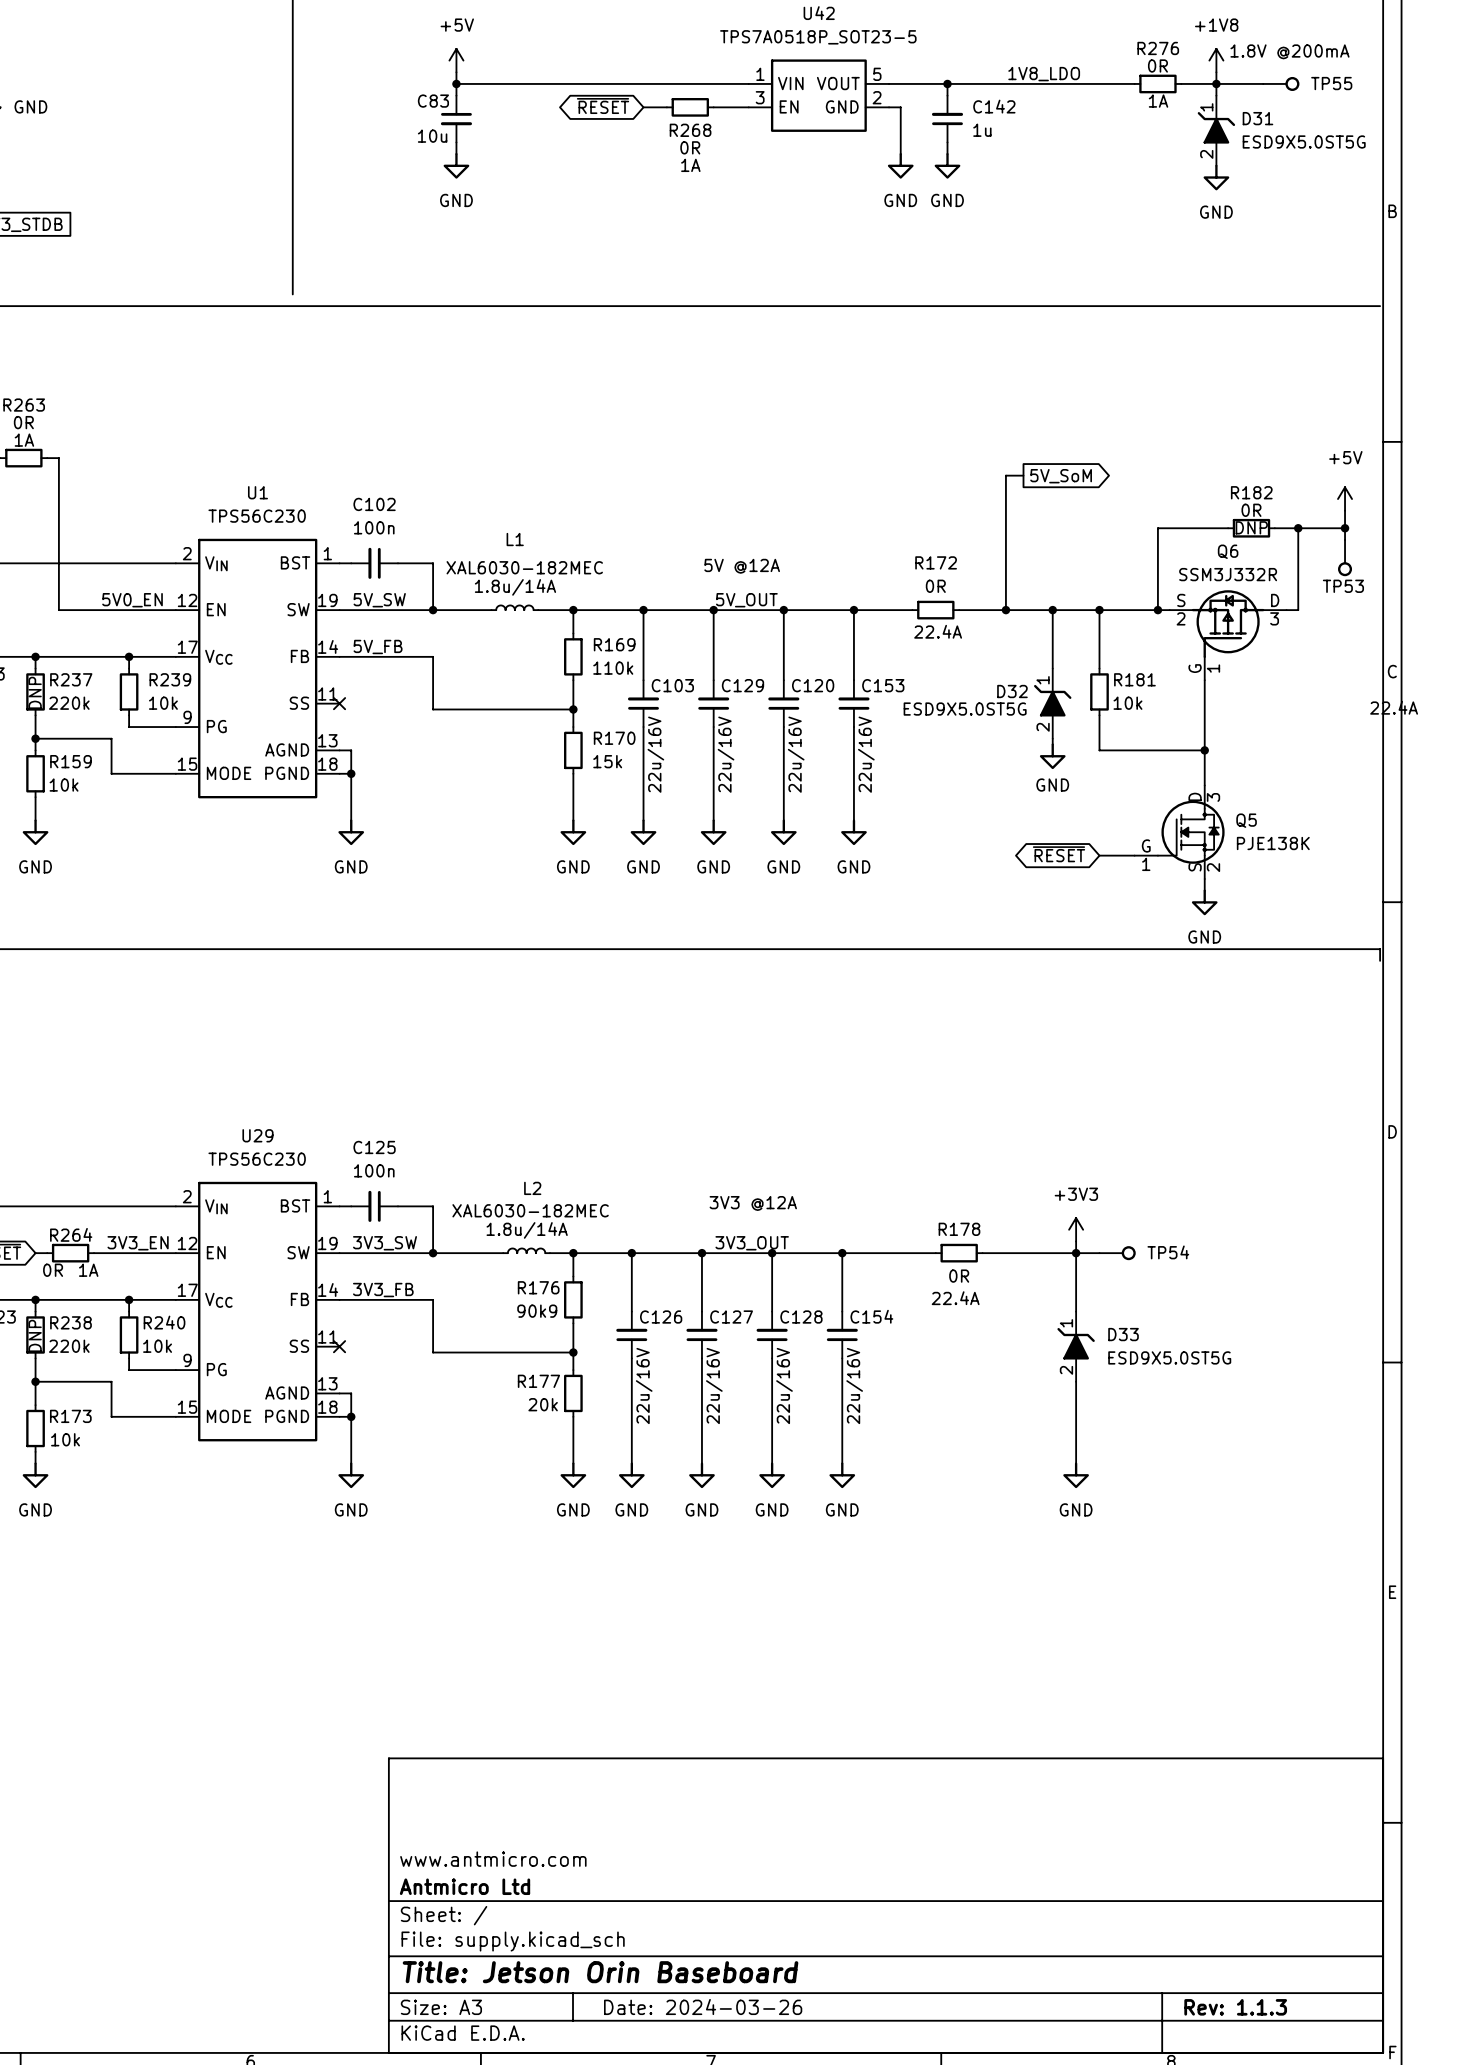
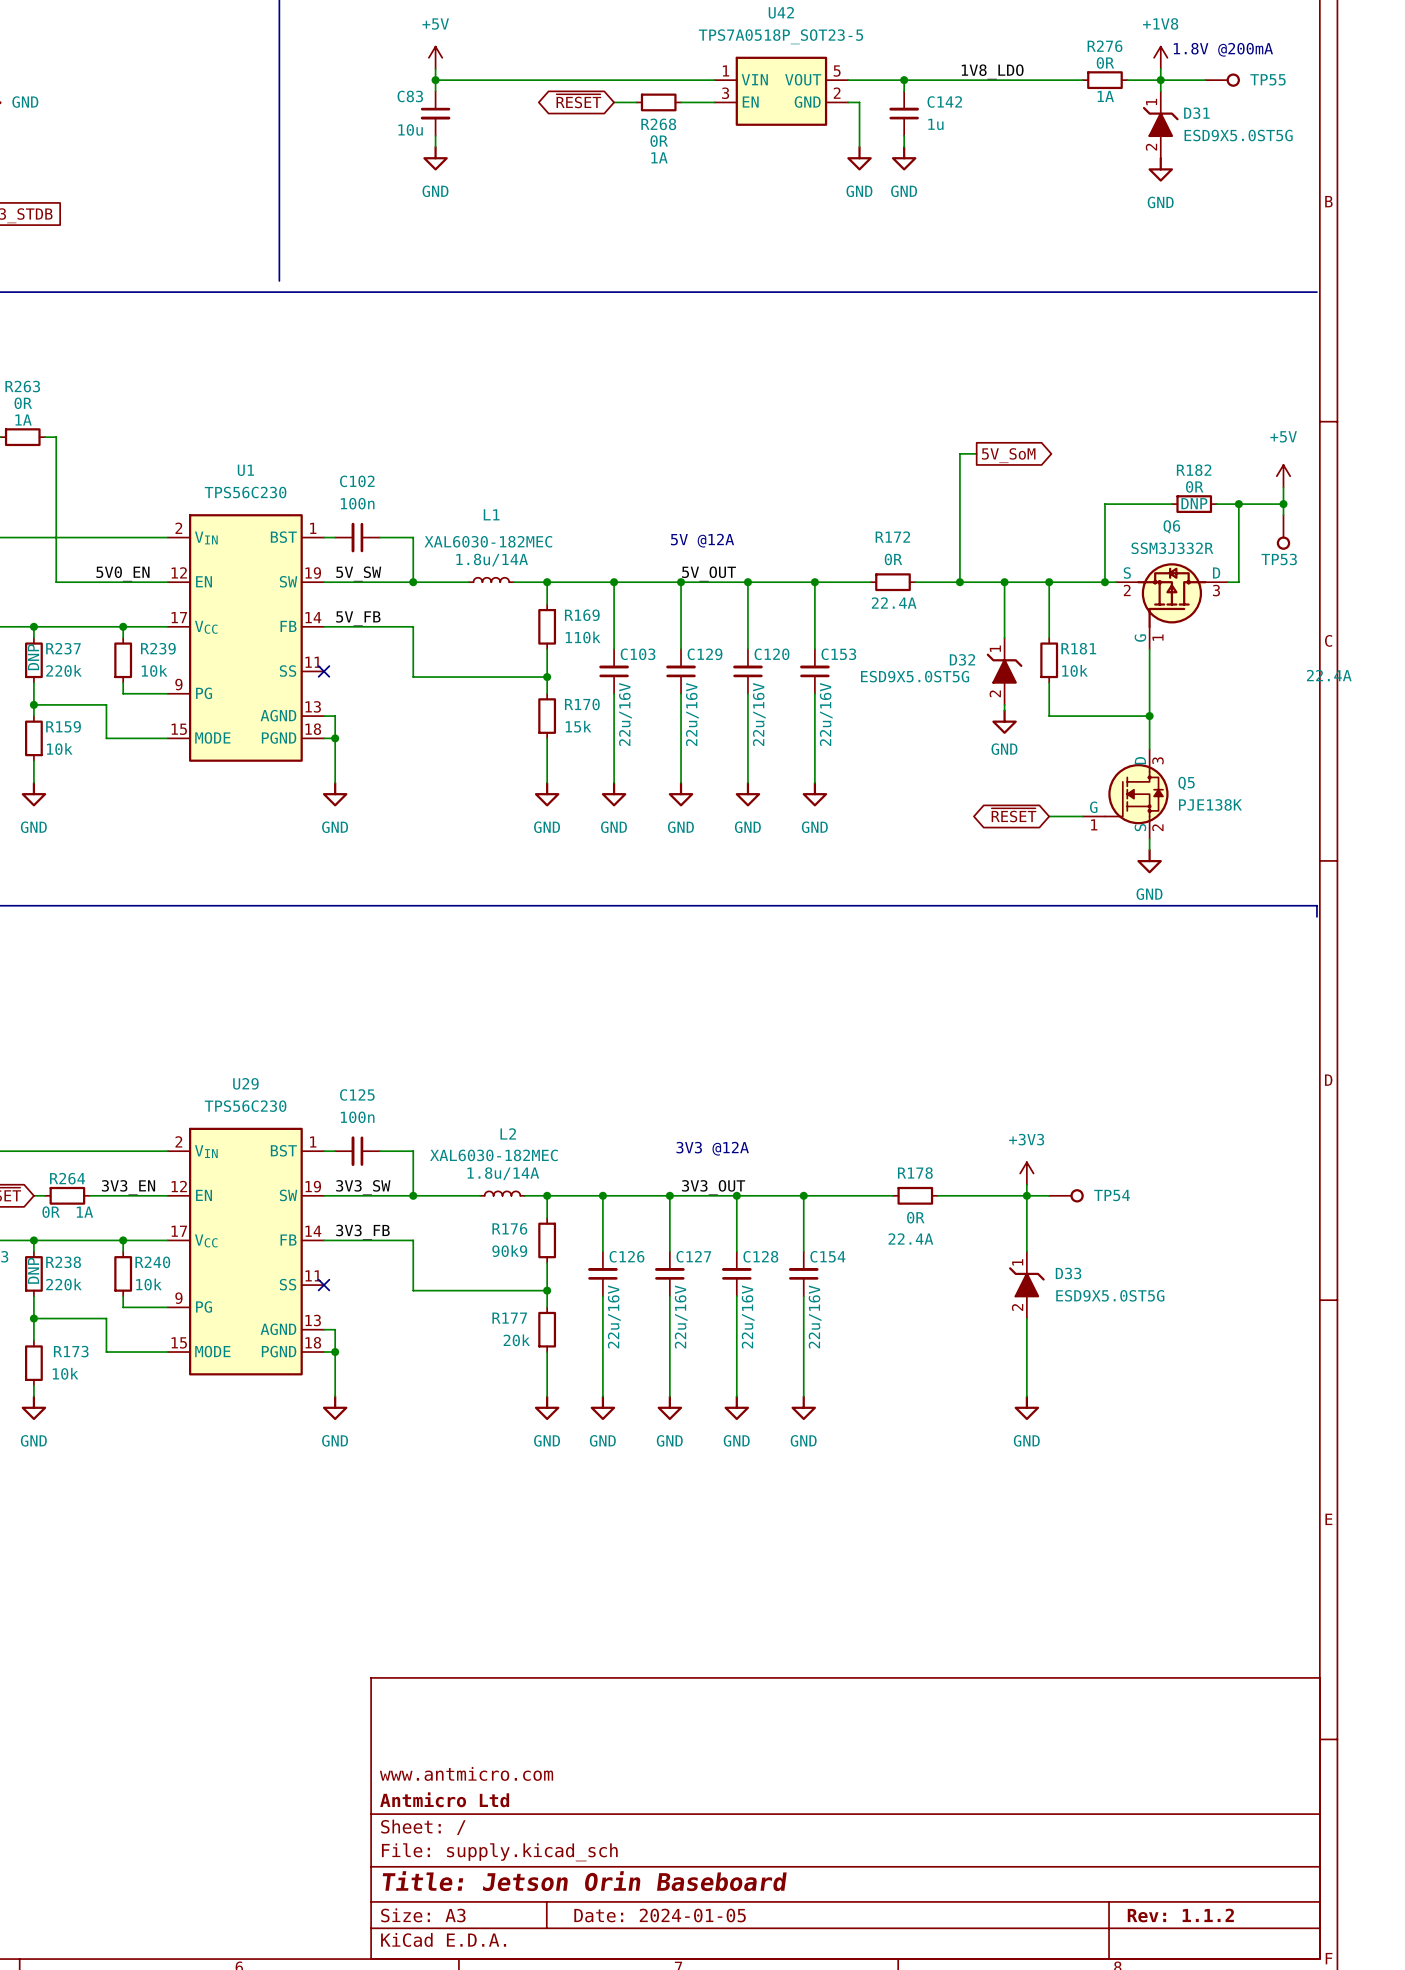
title block: Date: 2024-03-26 (703, 2007) -> Date: 2024-01-05 (660, 1915)
title block: Rev: 1.1.3 (1235, 2007) -> Rev: 1.1.2 (1180, 1915)

